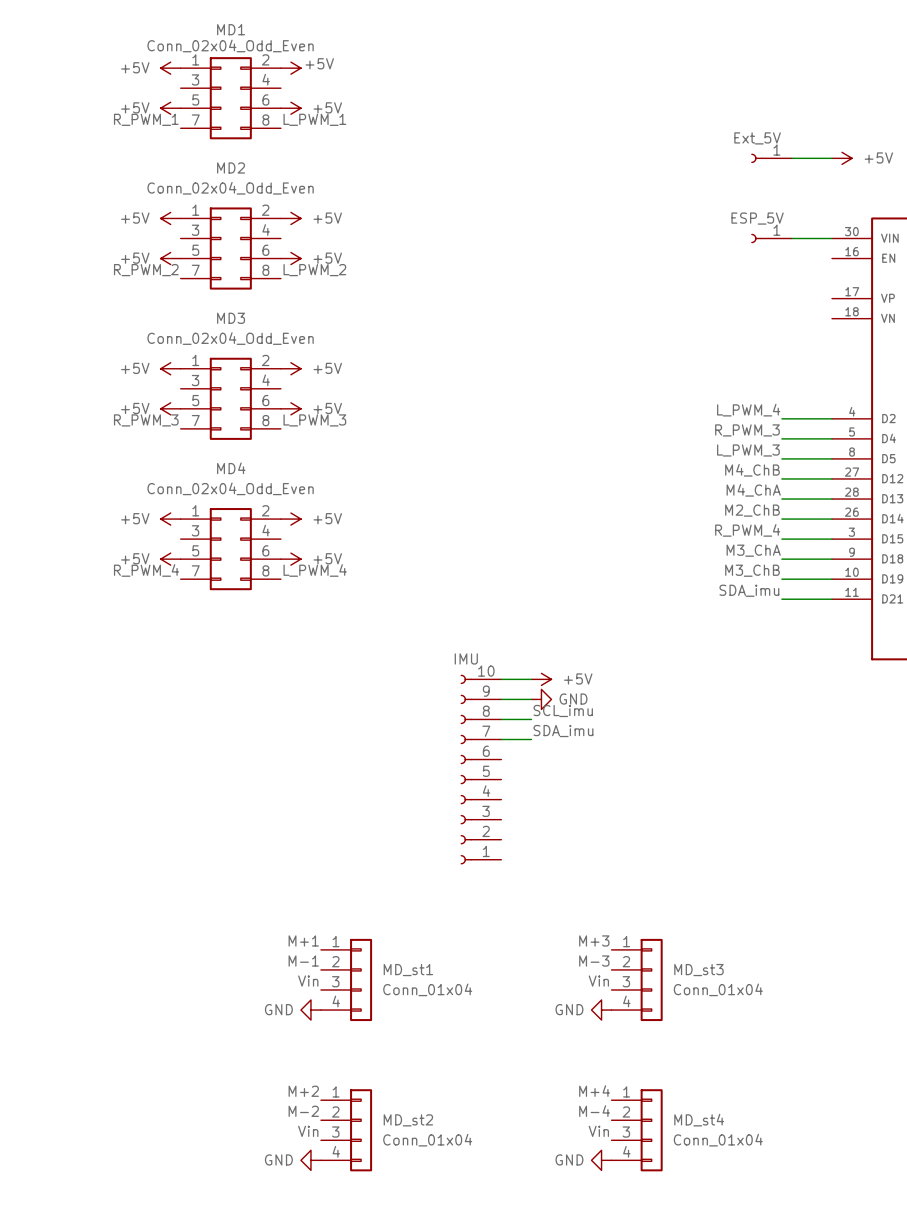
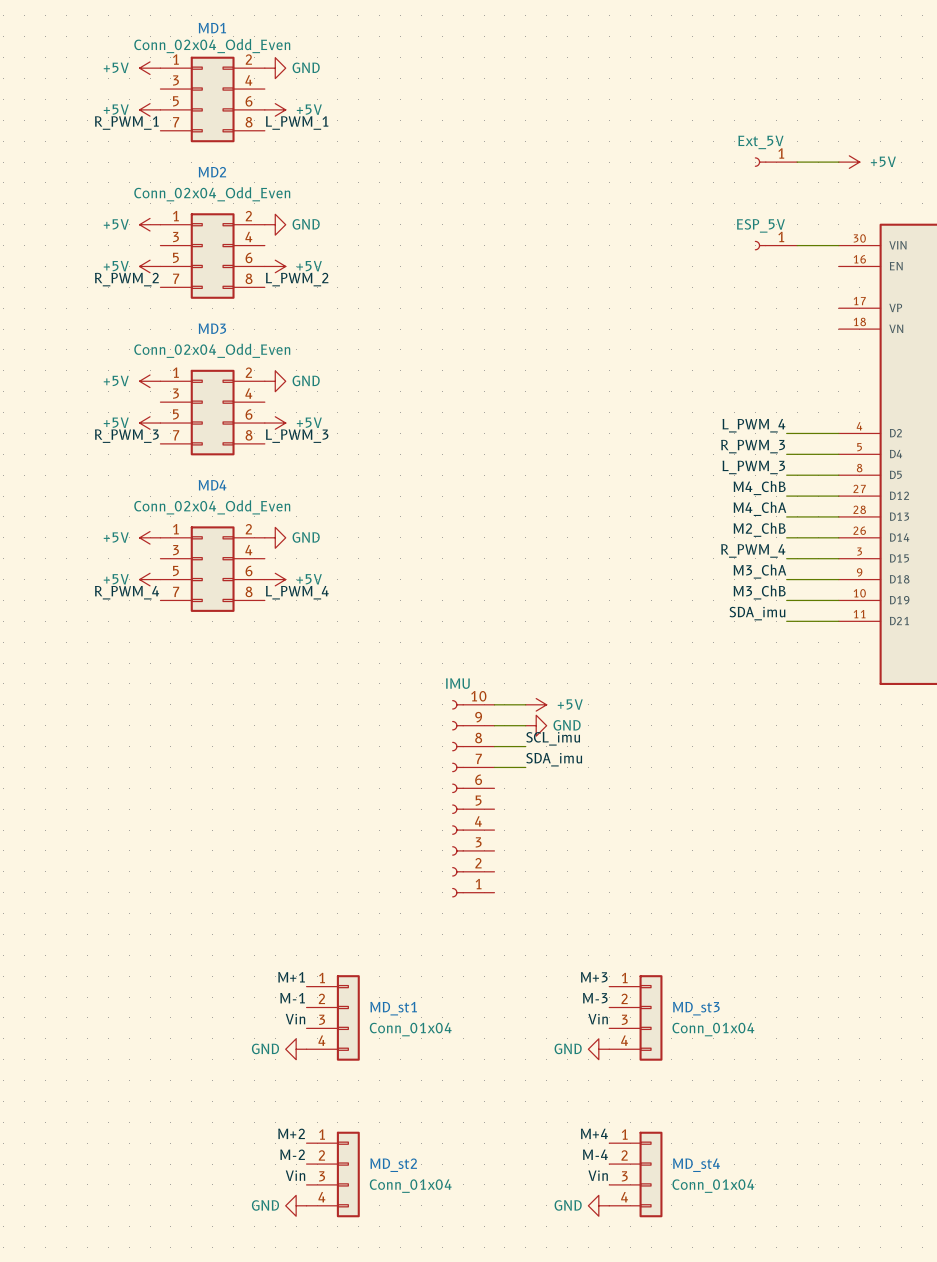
power symbol: +5V (290, 68) -> GND (275, 68)
power symbol: +5V (290, 218) -> GND (275, 224)
power symbol: +5V (290, 368) -> GND (275, 381)
power symbol: +5V (290, 519) -> GND (275, 537)

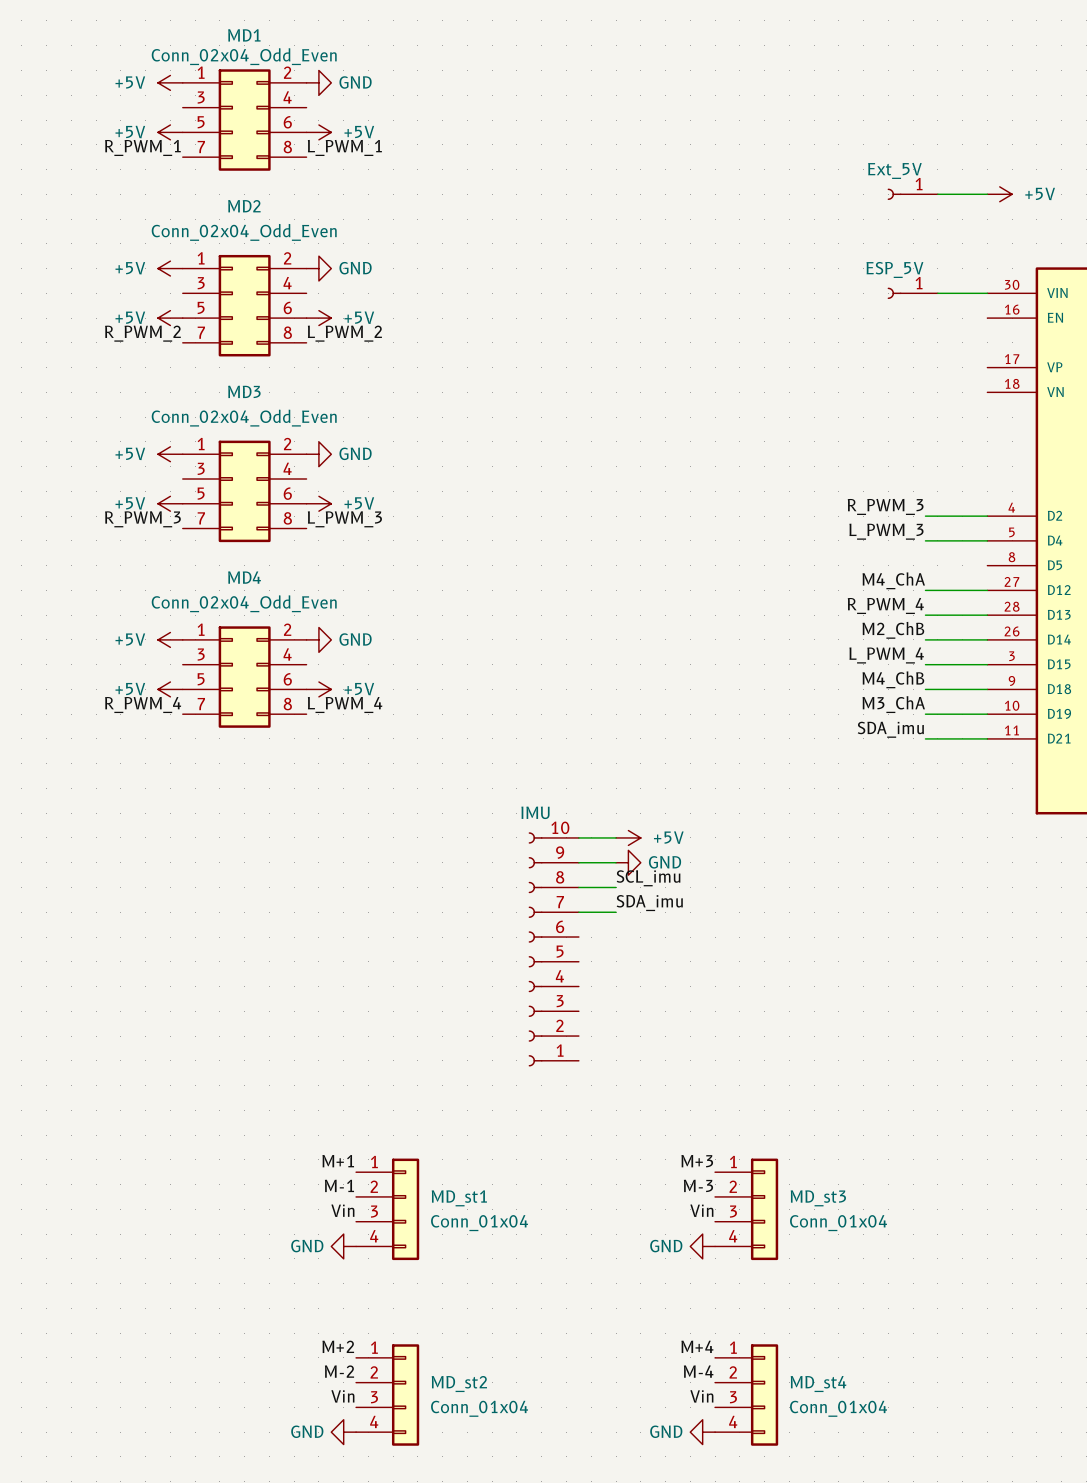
label: L_PWM_4 (753, 425) -> R_PWM_3 (885, 506)
label: R_PWM_3 (753, 446) -> L_PWM_3 (886, 531)
label: L_PWM_3 (753, 467) -> none
wire: (786, 475) (838, 475) -> none
label: M4_ChB (759, 487) -> M4_ChA (893, 580)
label: M4_ChA (759, 508) -> R_PWM_4 (885, 605)
label: R_PWM_4 (753, 550) -> L_PWM_4 (886, 655)
label: M3_ChA (759, 571) -> M4_ChB (893, 679)
label: M3_ChB (759, 592) -> M3_ChA (893, 704)

